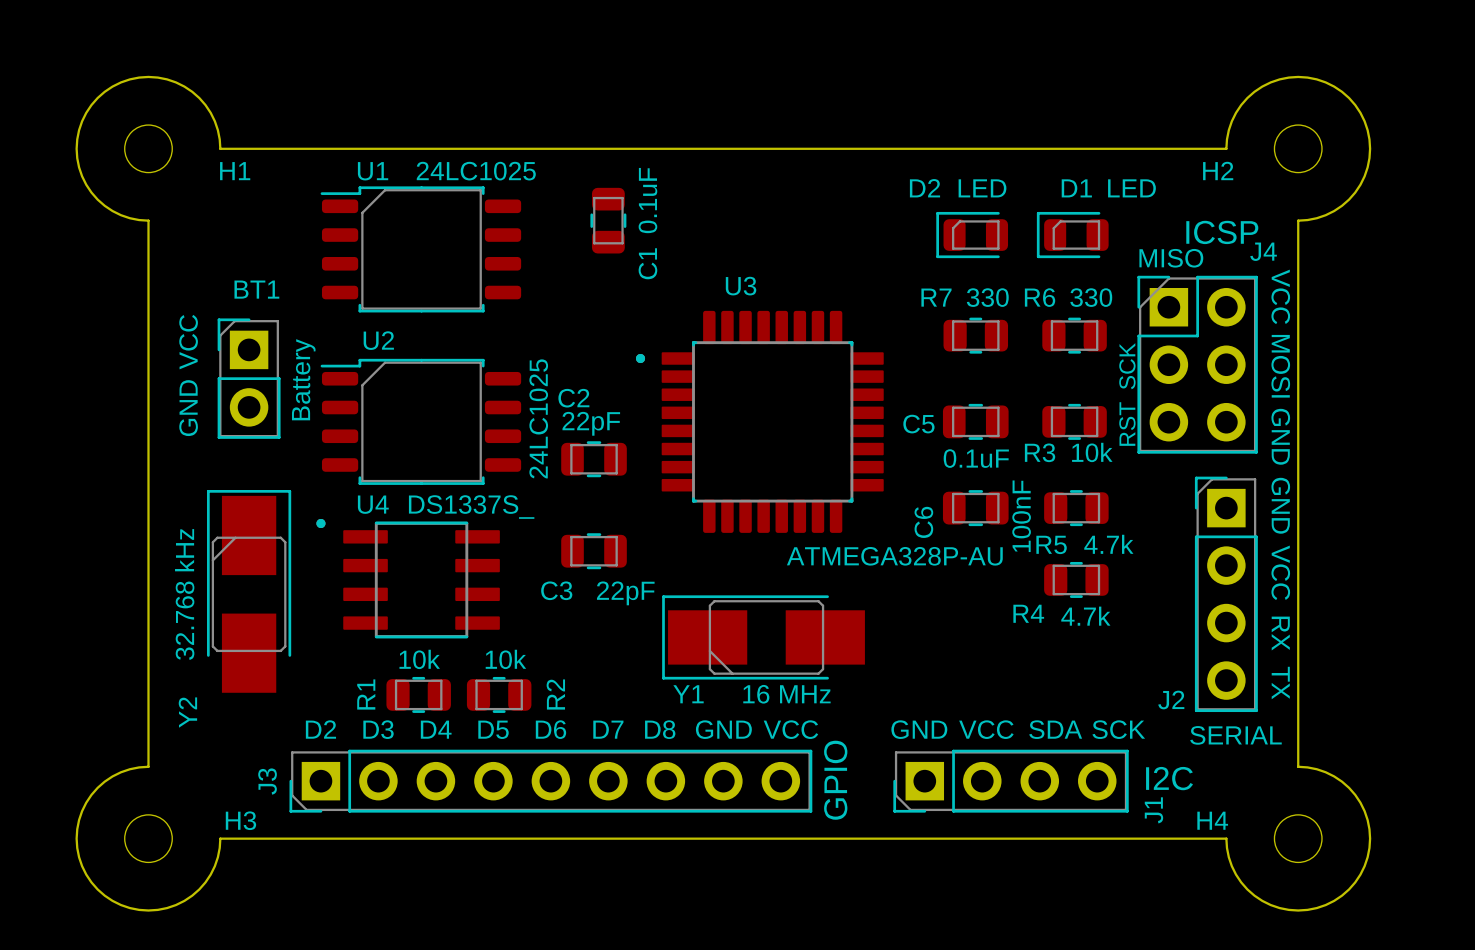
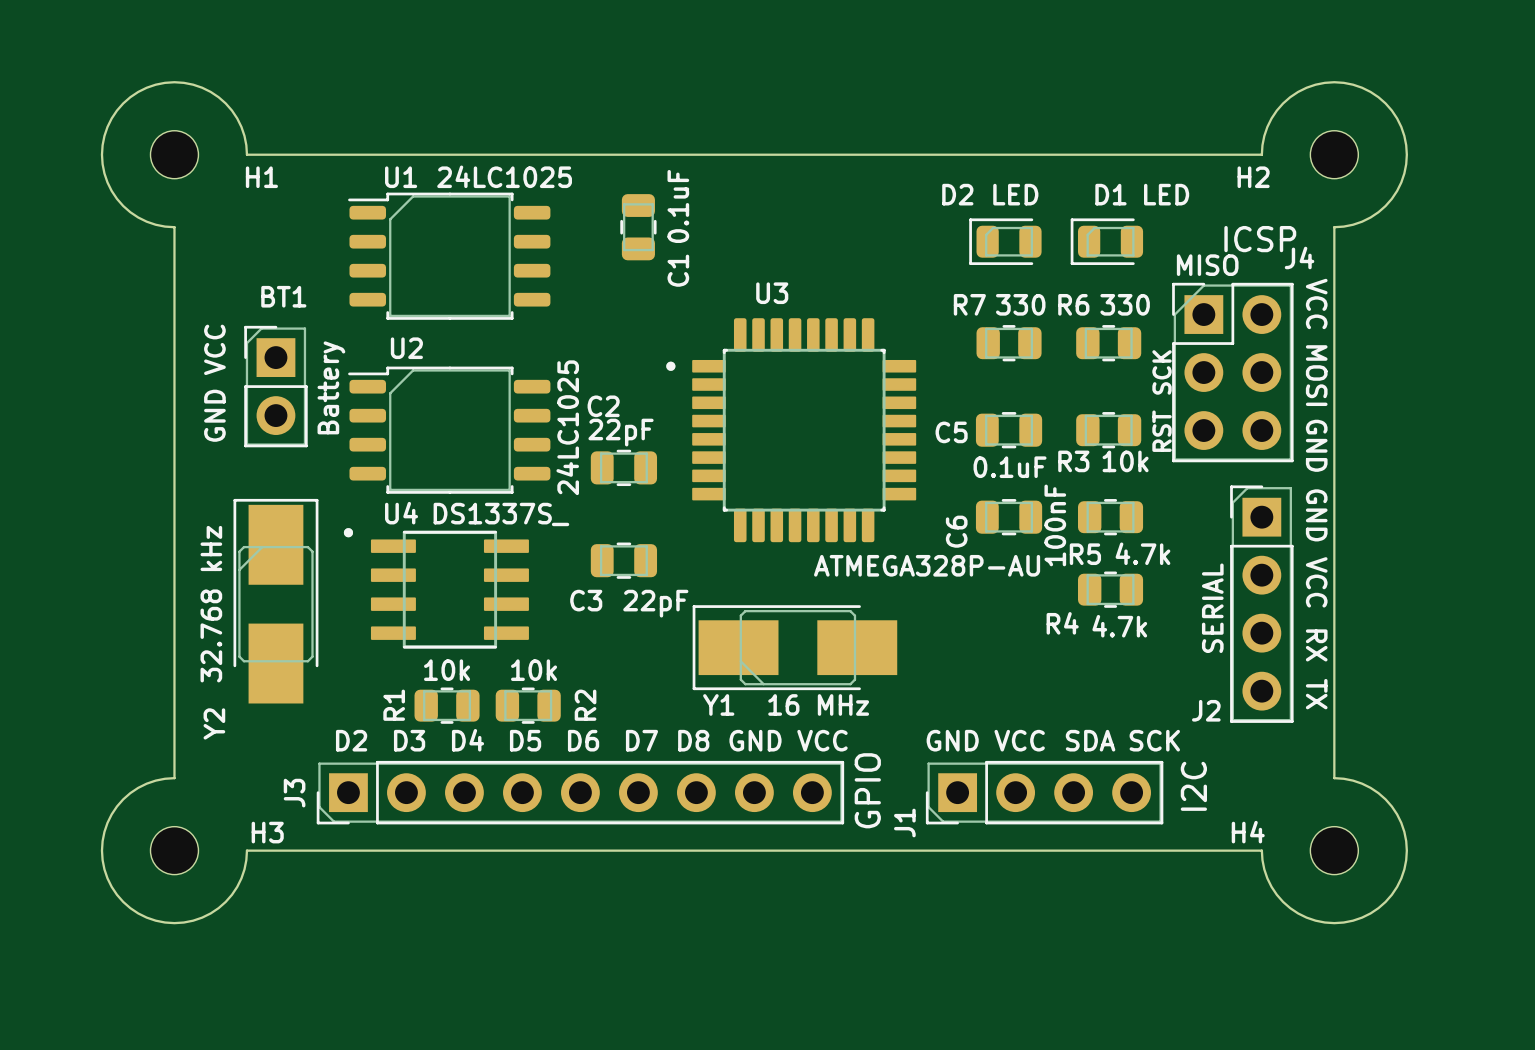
text rotation: 0° (1235, 735) -> 90° counterclockwise (1212, 608)
text position: SERIAL (1235, 735) -> SERIAL (1212, 608)
text rotation: 0° (1169, 778) -> 90° counterclockwise (1193, 786)
J1 name position: J1 (1153, 810) -> J1 (904, 822)

